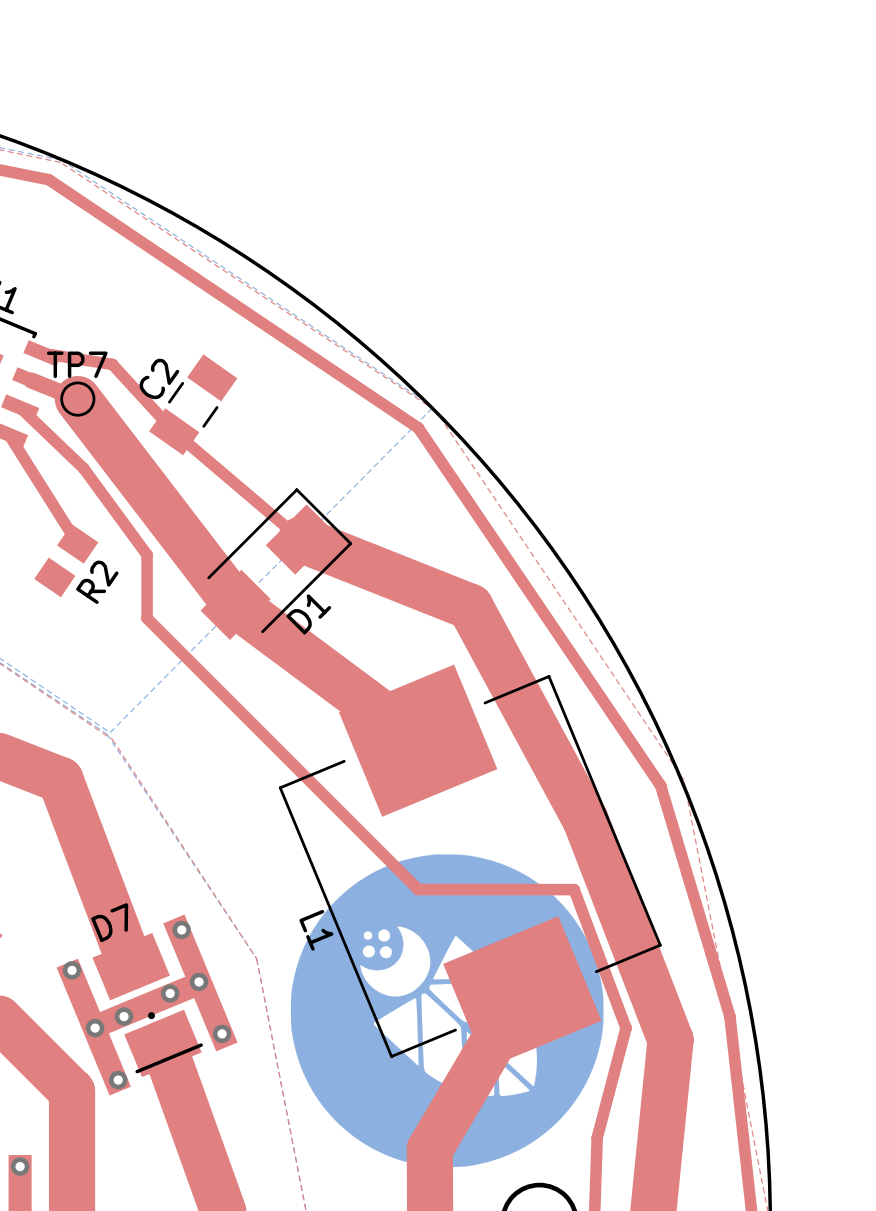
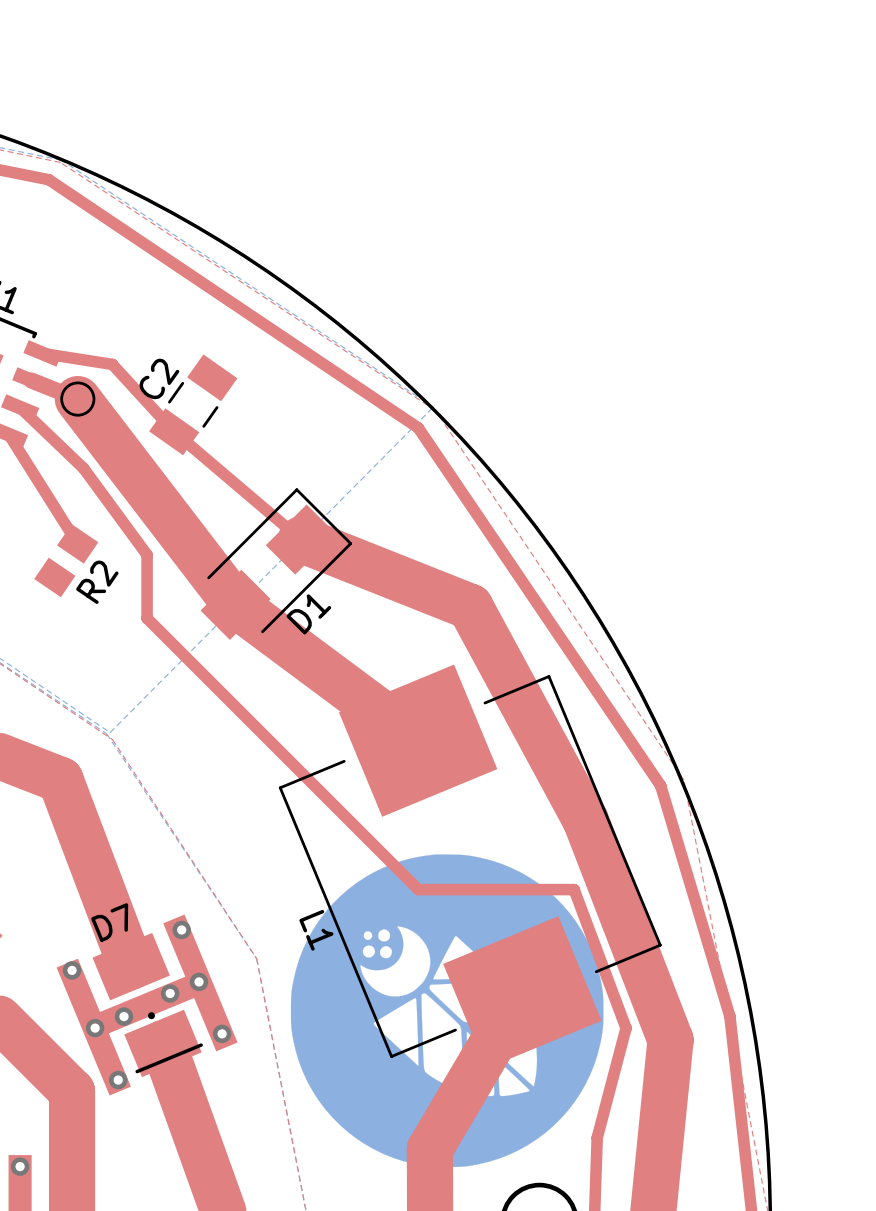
TP7 name: TP7 (77, 364) -> none

